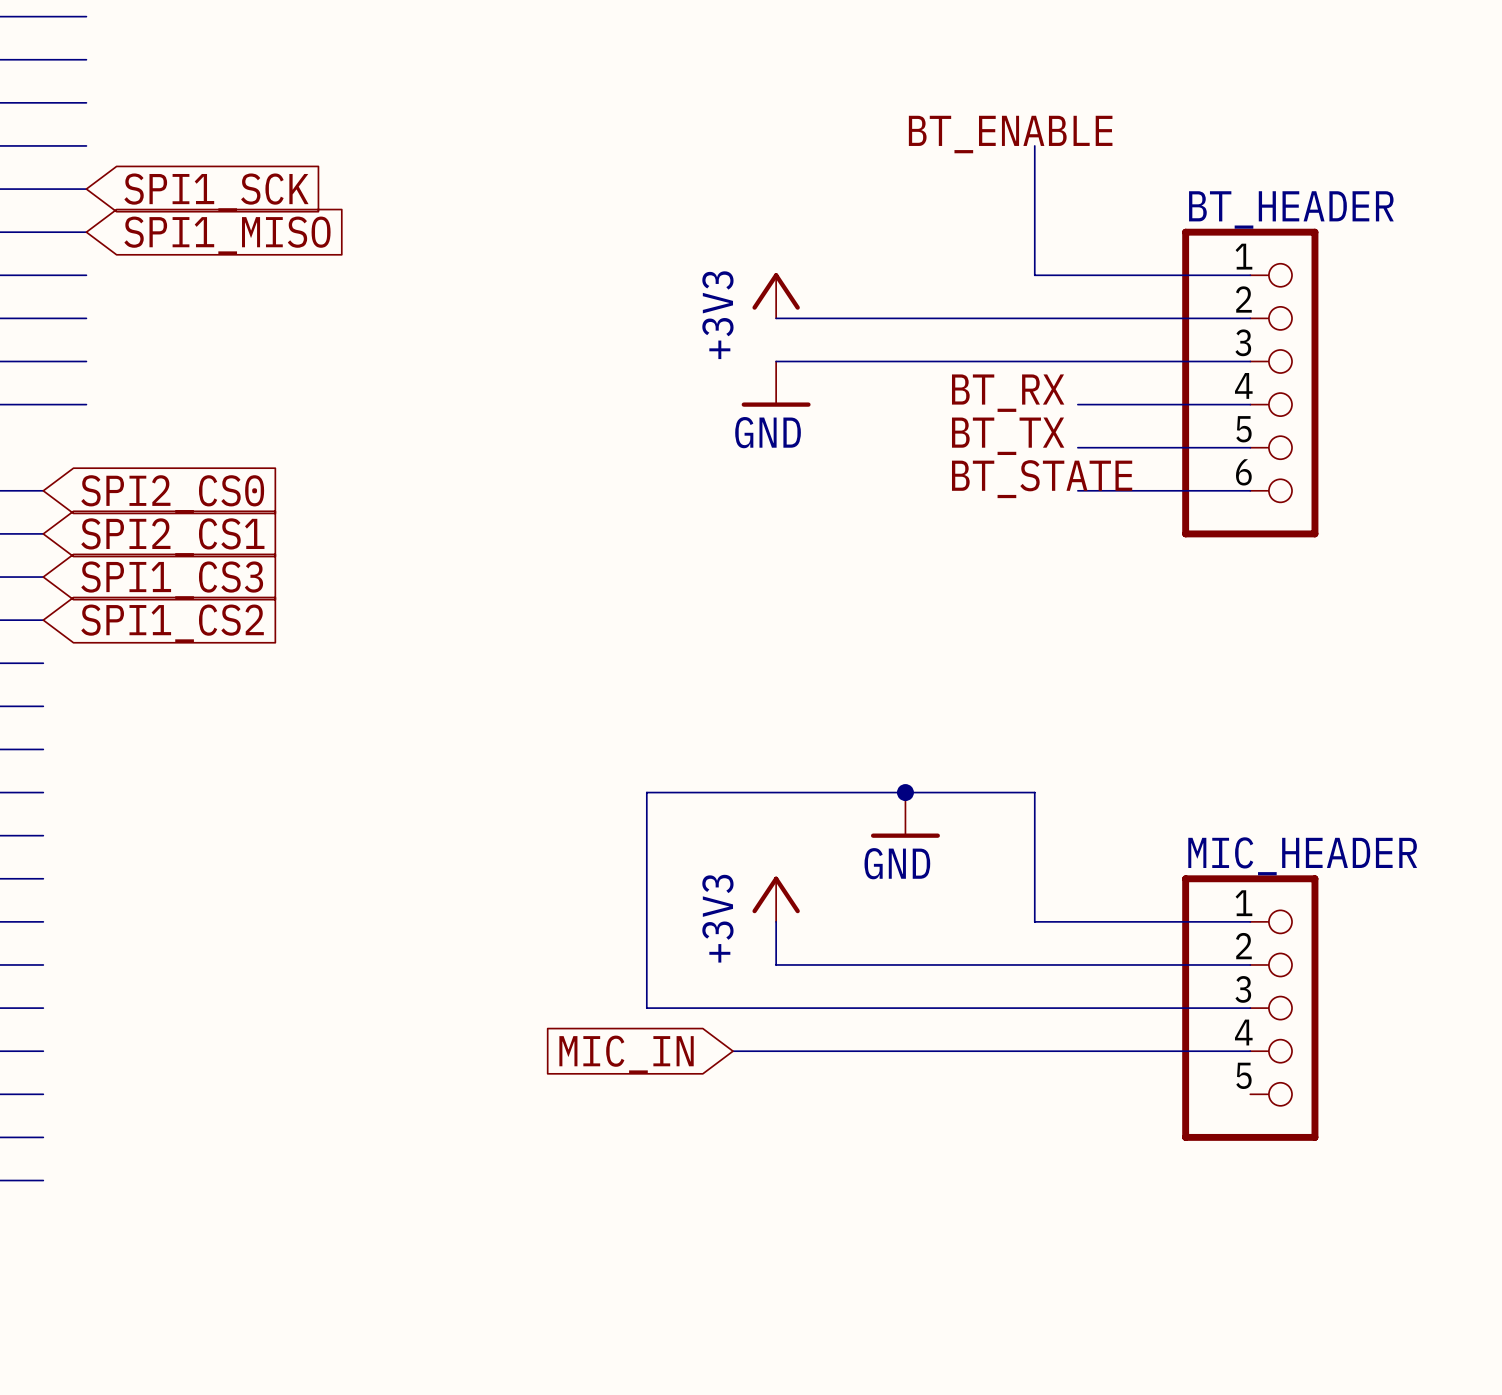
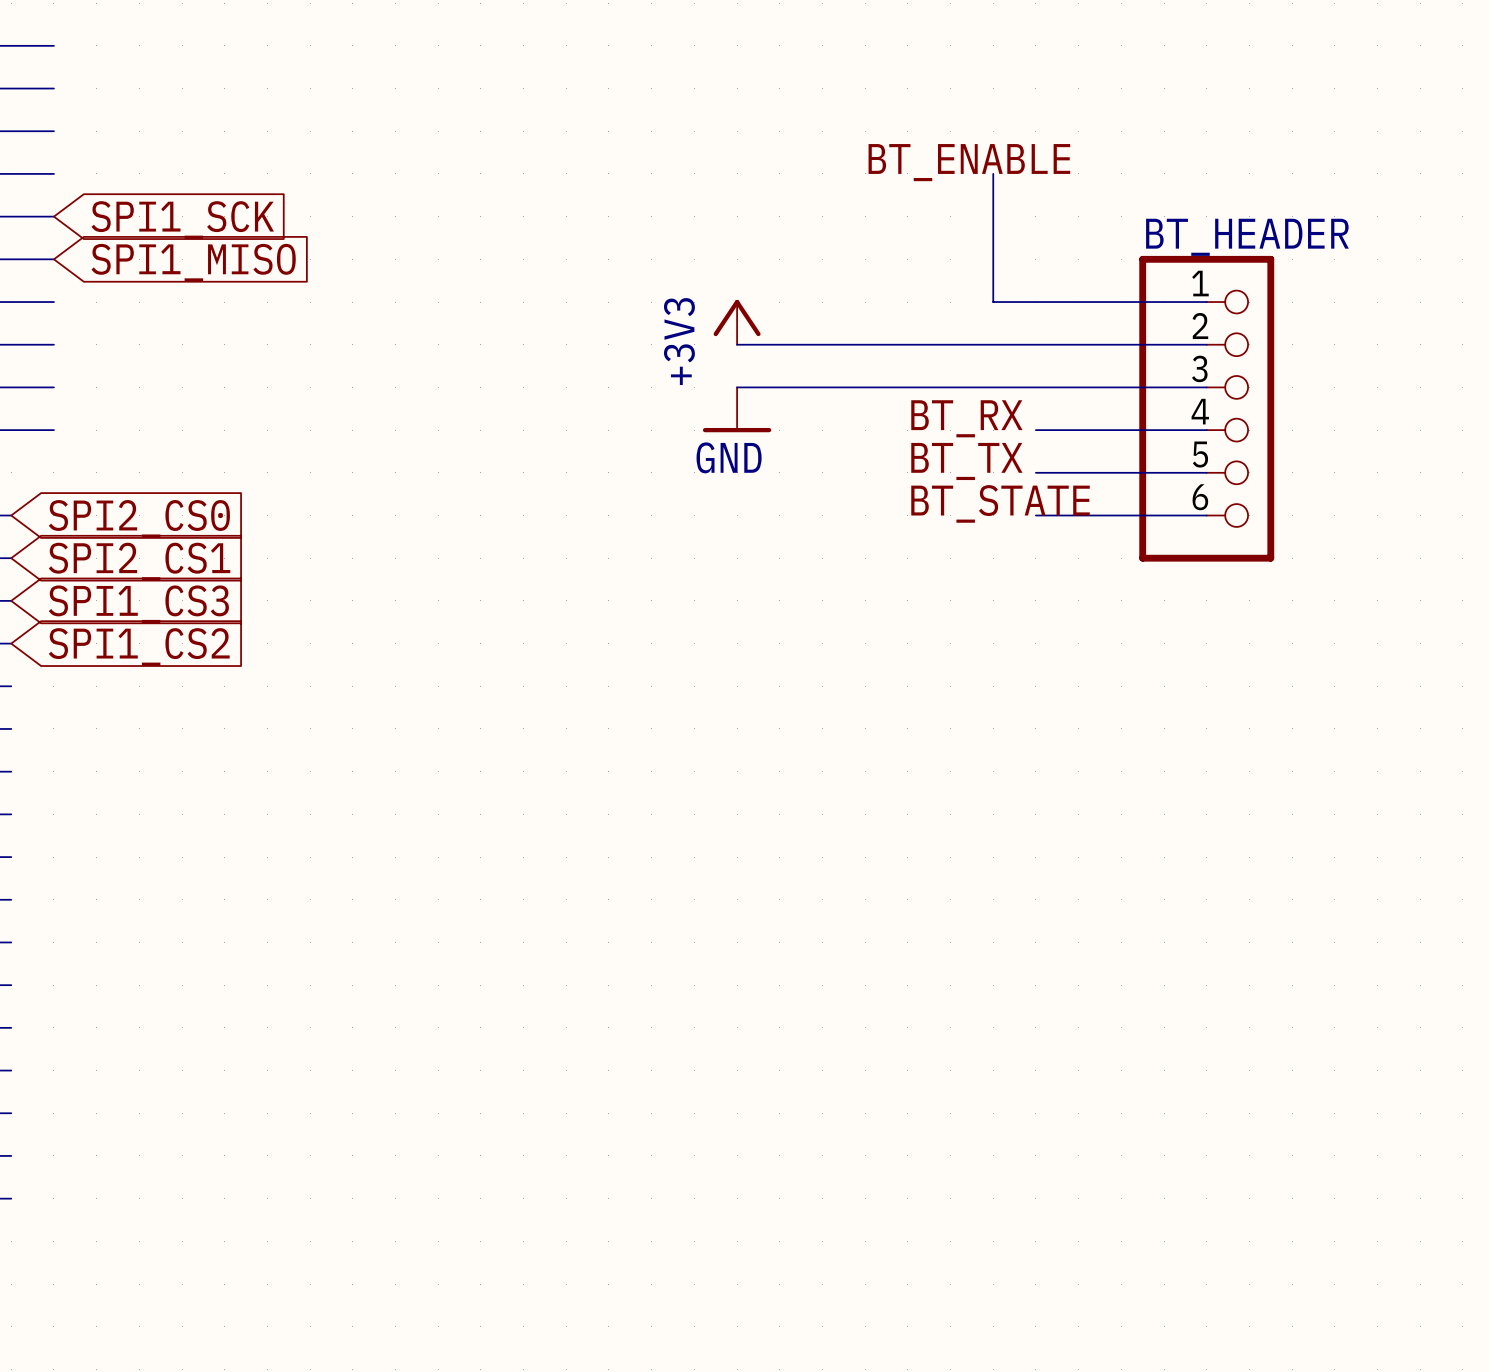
junction: (905, 792) -> none
power symbol: GND (905, 815) -> none
power symbol: +3V3 (776, 899) -> none
wire: (776, 921) (776, 964) (1250, 964) -> none
wire: (1250, 921) (1034, 921) (1034, 792) (646, 792) (646, 1008) (1250, 1008) -> none
MIC_HEADER: (1250, 1008) -> none
wire: (733, 1051) (1250, 1051) -> none
global label: MIC_IN (626, 1054) -> none

